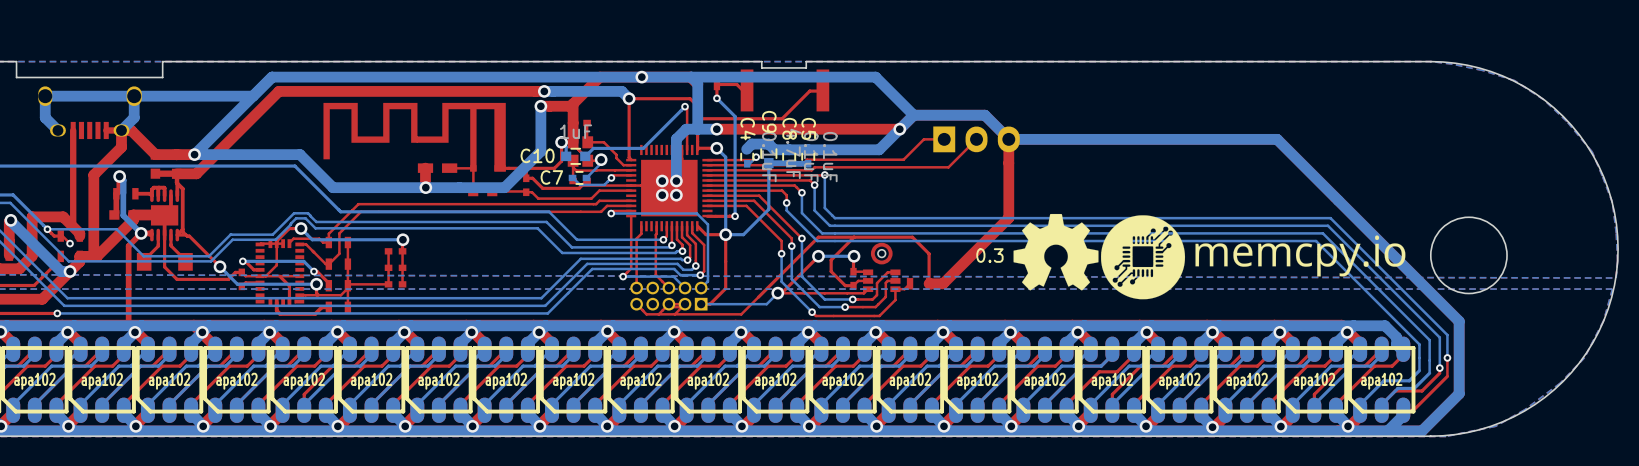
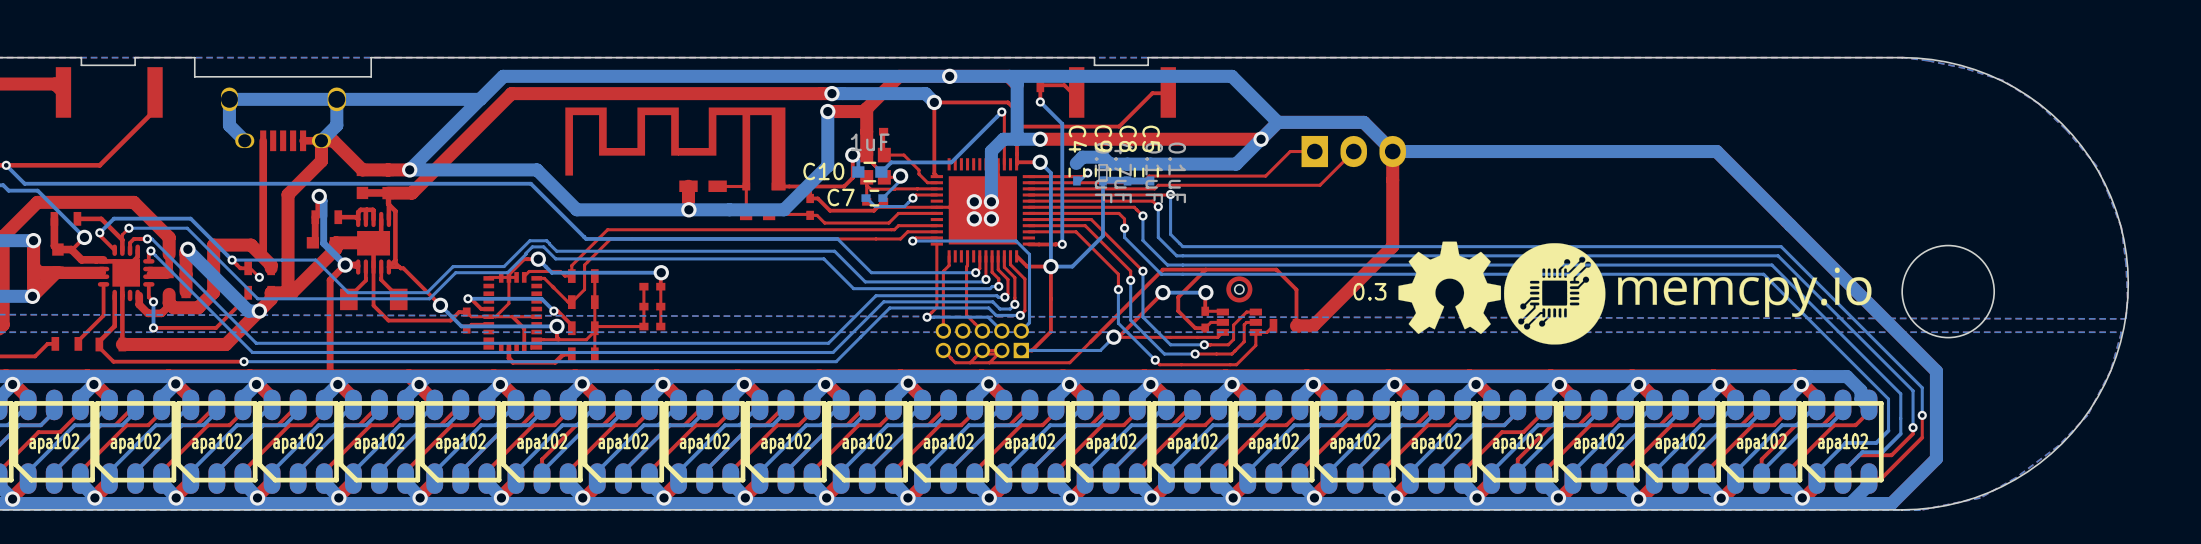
C9 footprint: [760, 138, 778, 169] -> [1094, 159, 1112, 186]

